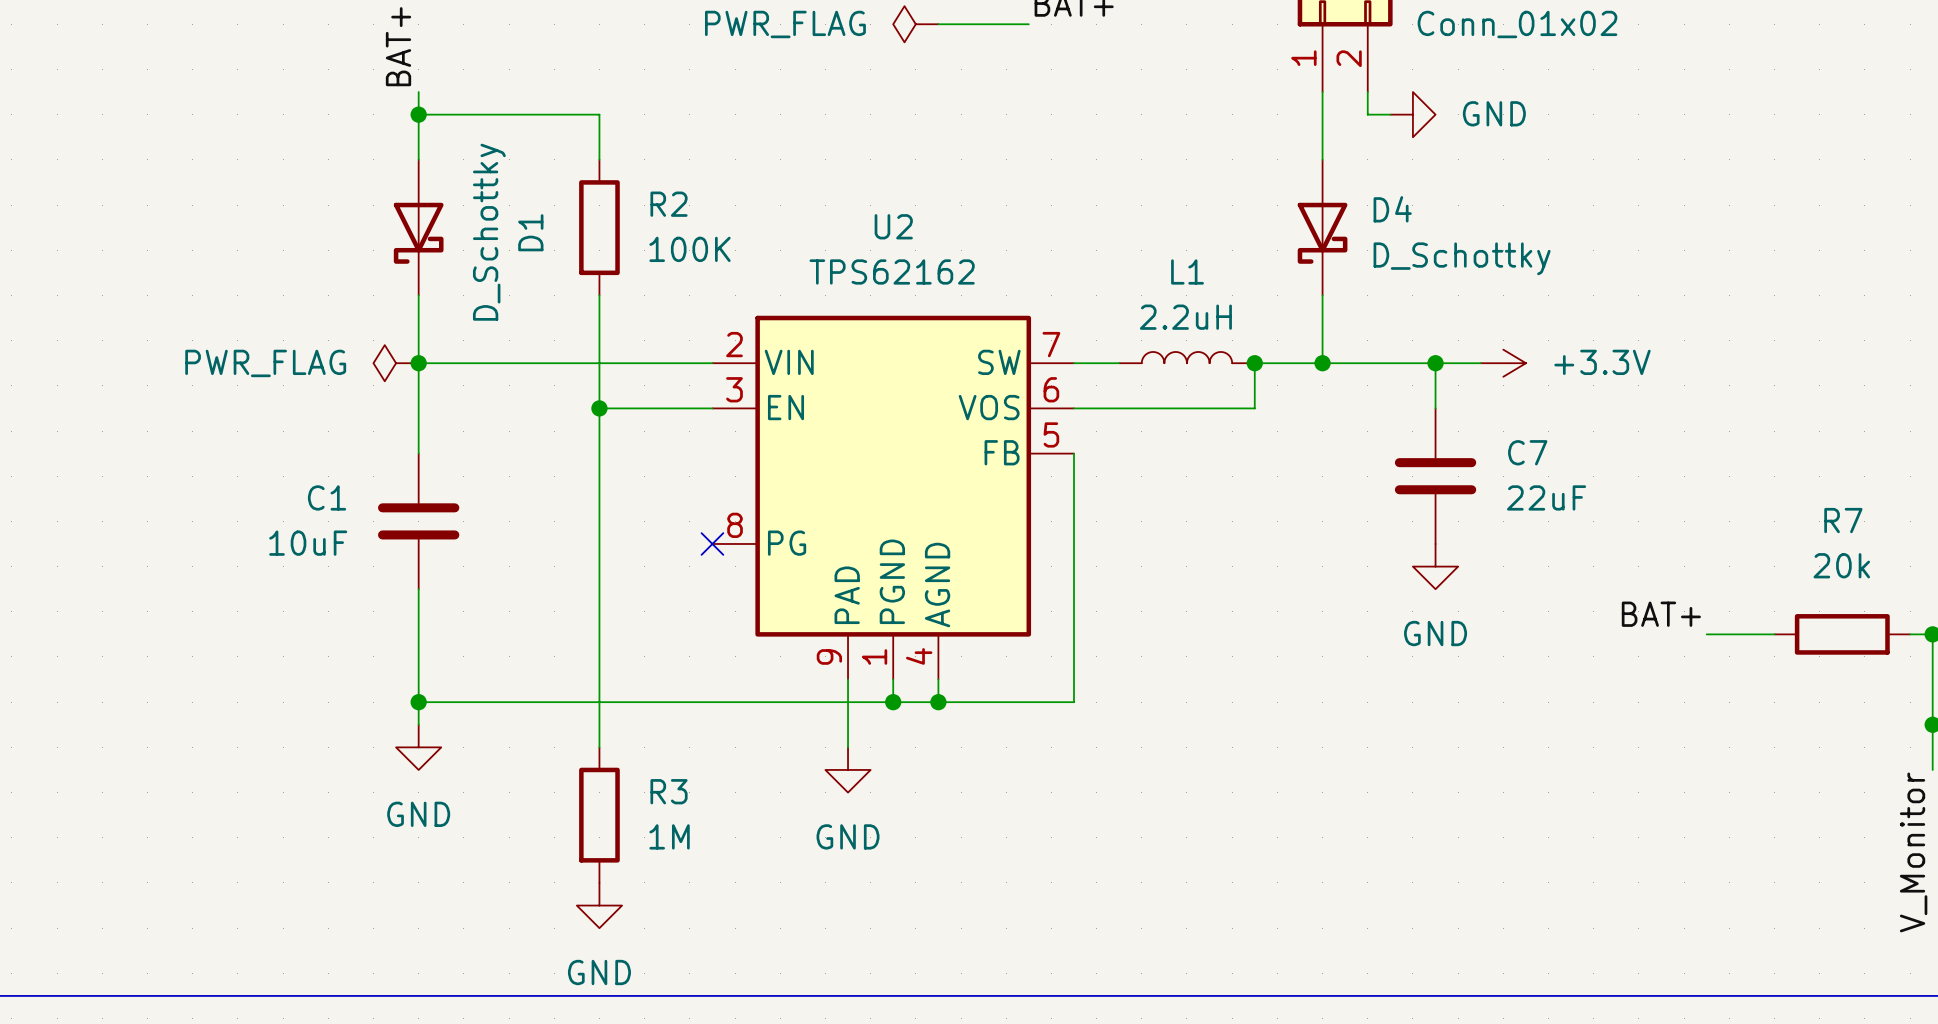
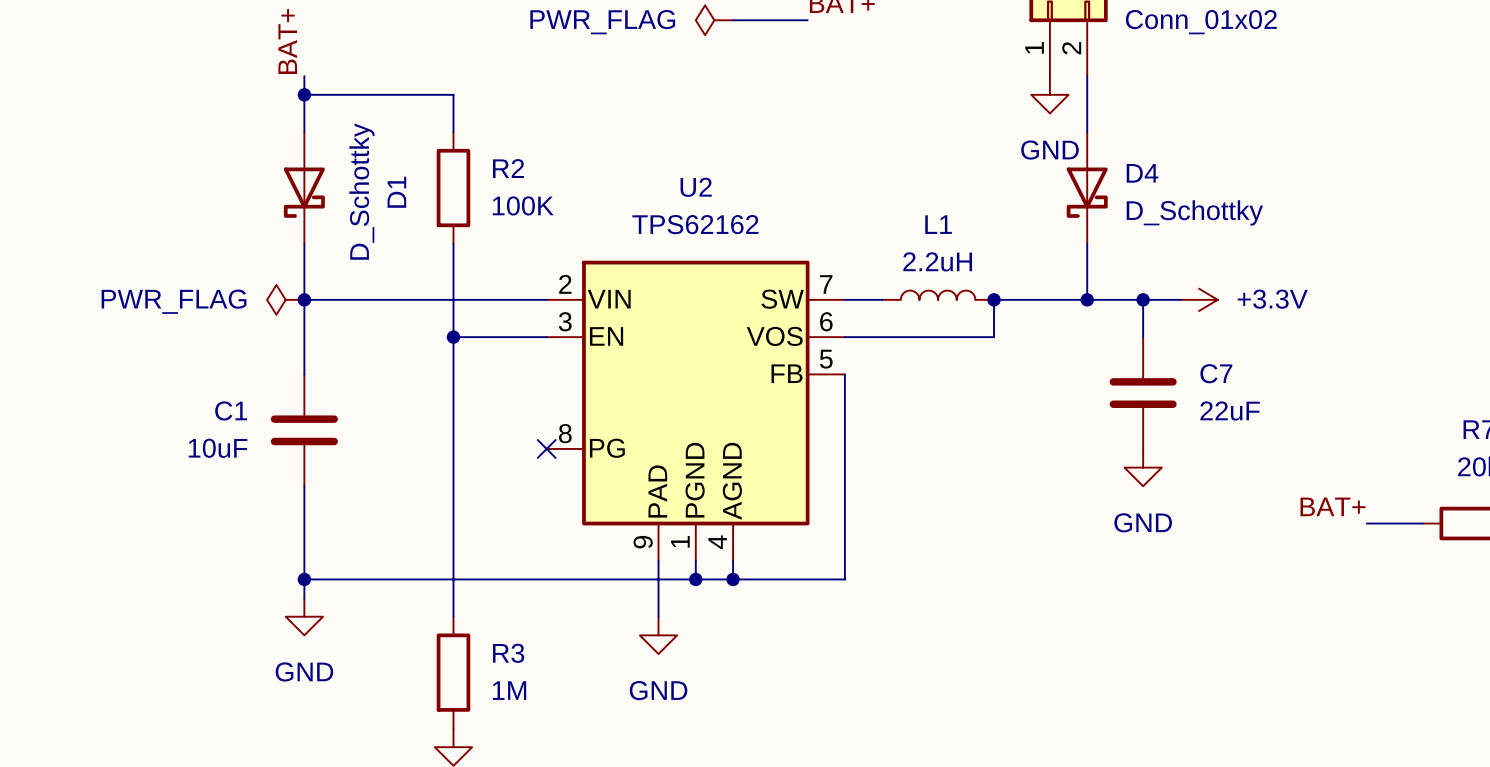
wire: (1322, 92) (1322, 159) -> none
wire: (1367, 114) (1390, 114) -> (1087, 94) (1087, 132)
power symbol rotation: 0° (1412, 114) -> 90° clockwise (1049, 94)
power symbol position: GND (1412, 114) -> GND (1049, 94)
D4 position: (1322, 227) -> (1087, 188)
wire: (1322, 295) (1322, 363) -> (1087, 243) (1087, 299)
junction position: (1322, 363) -> (1087, 299)

